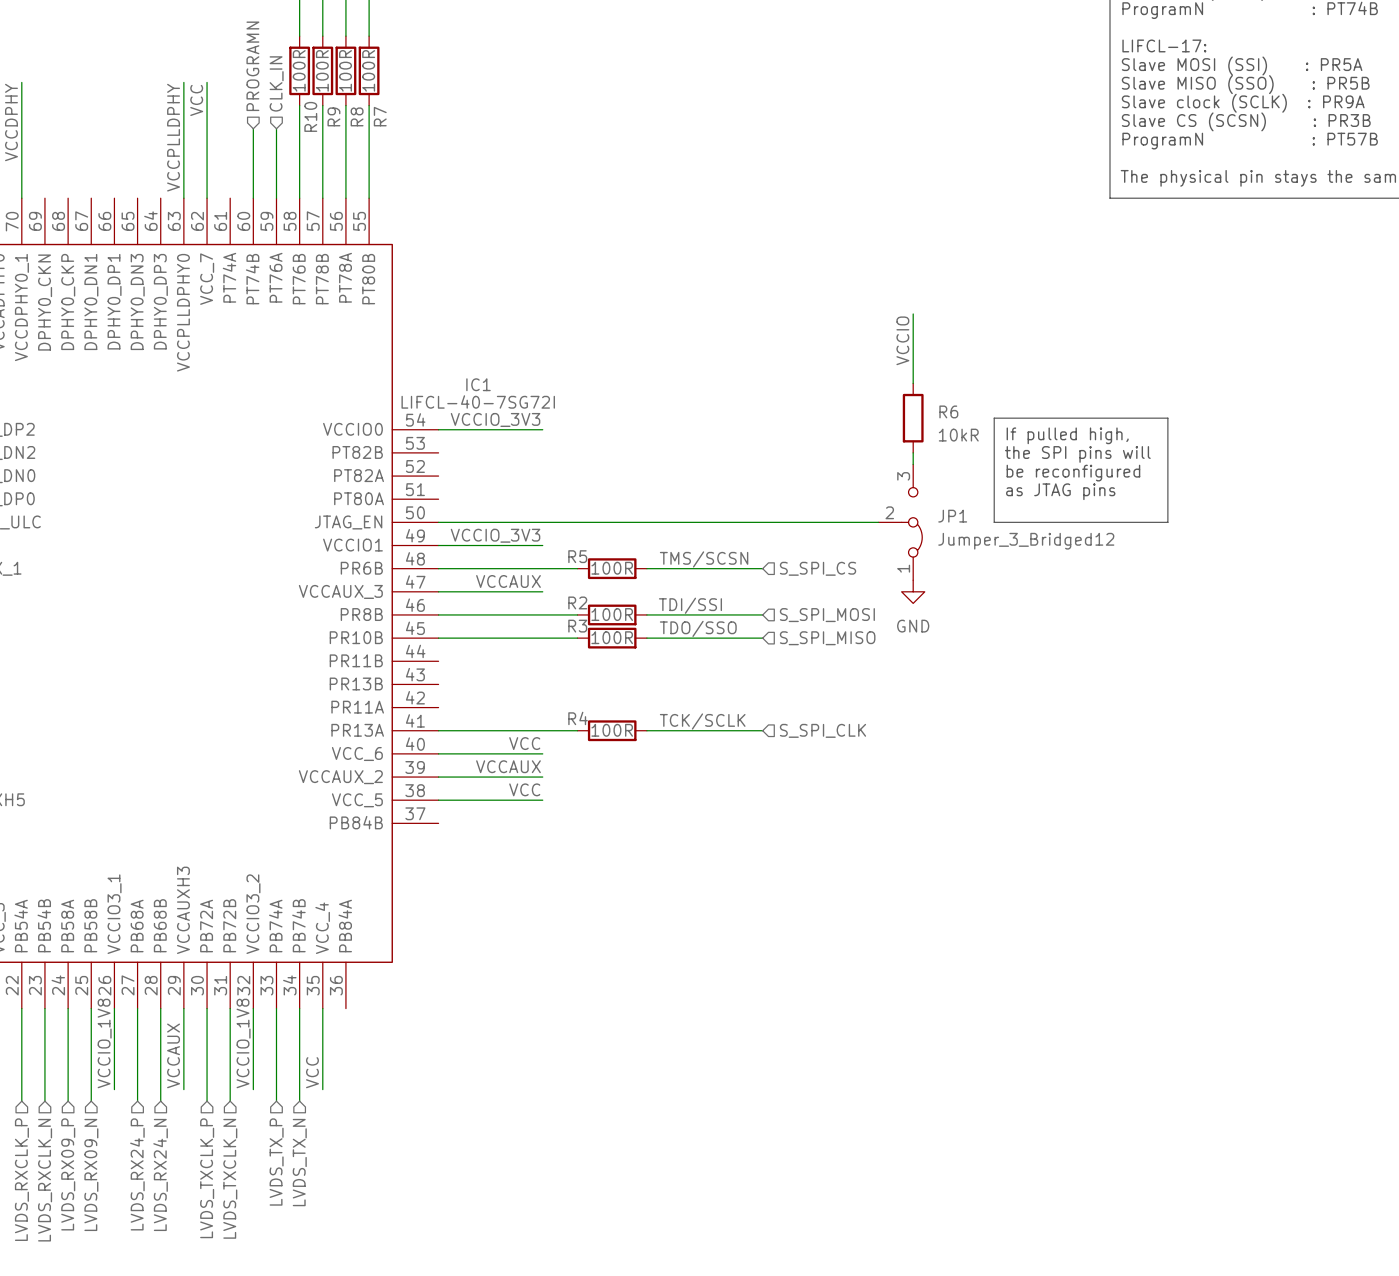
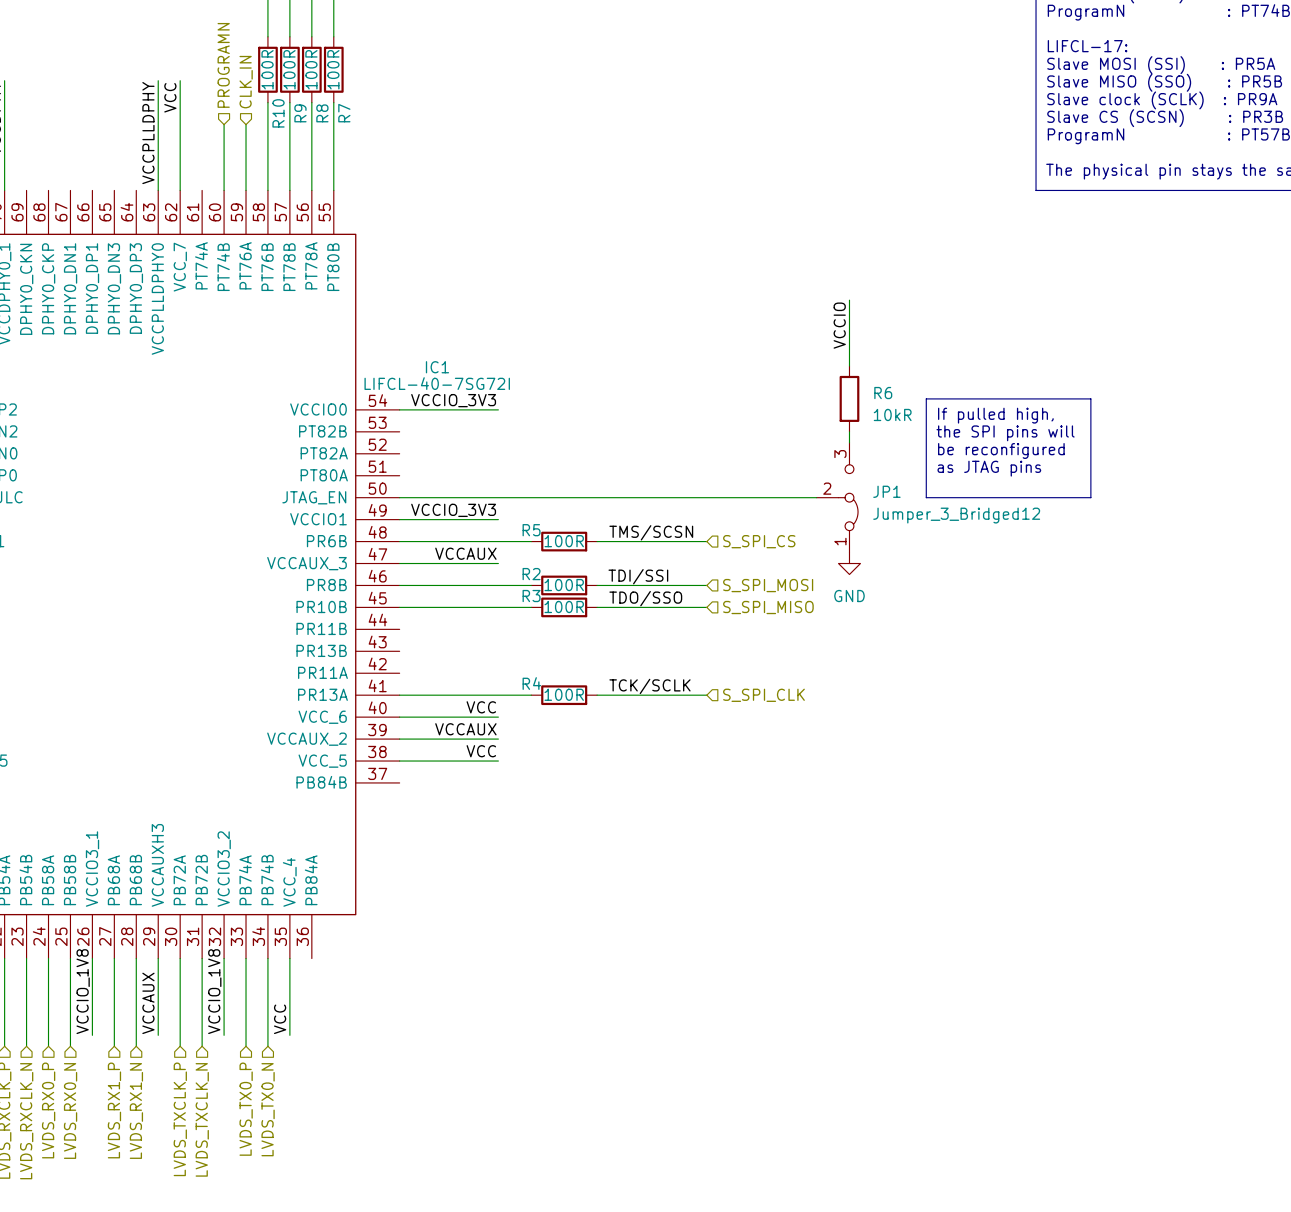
hierarchical label: LVDS_TX_P (276, 1162) -> LVDS_TX0_P (246, 1109)
hierarchical label: LVDS_TX_N (299, 1162) -> LVDS_TX0_N (268, 1109)
hierarchical label: LVDS_RX09_P (68, 1174) -> LVDS_RX0_P (48, 1110)
hierarchical label: LVDS_RX09_N (91, 1174) -> LVDS_RX0_N (70, 1110)
hierarchical label: LVDS_RX24_P (137, 1174) -> LVDS_RX1_P (114, 1110)
hierarchical label: LVDS_RX24_N (160, 1174) -> LVDS_RX1_N (136, 1110)

